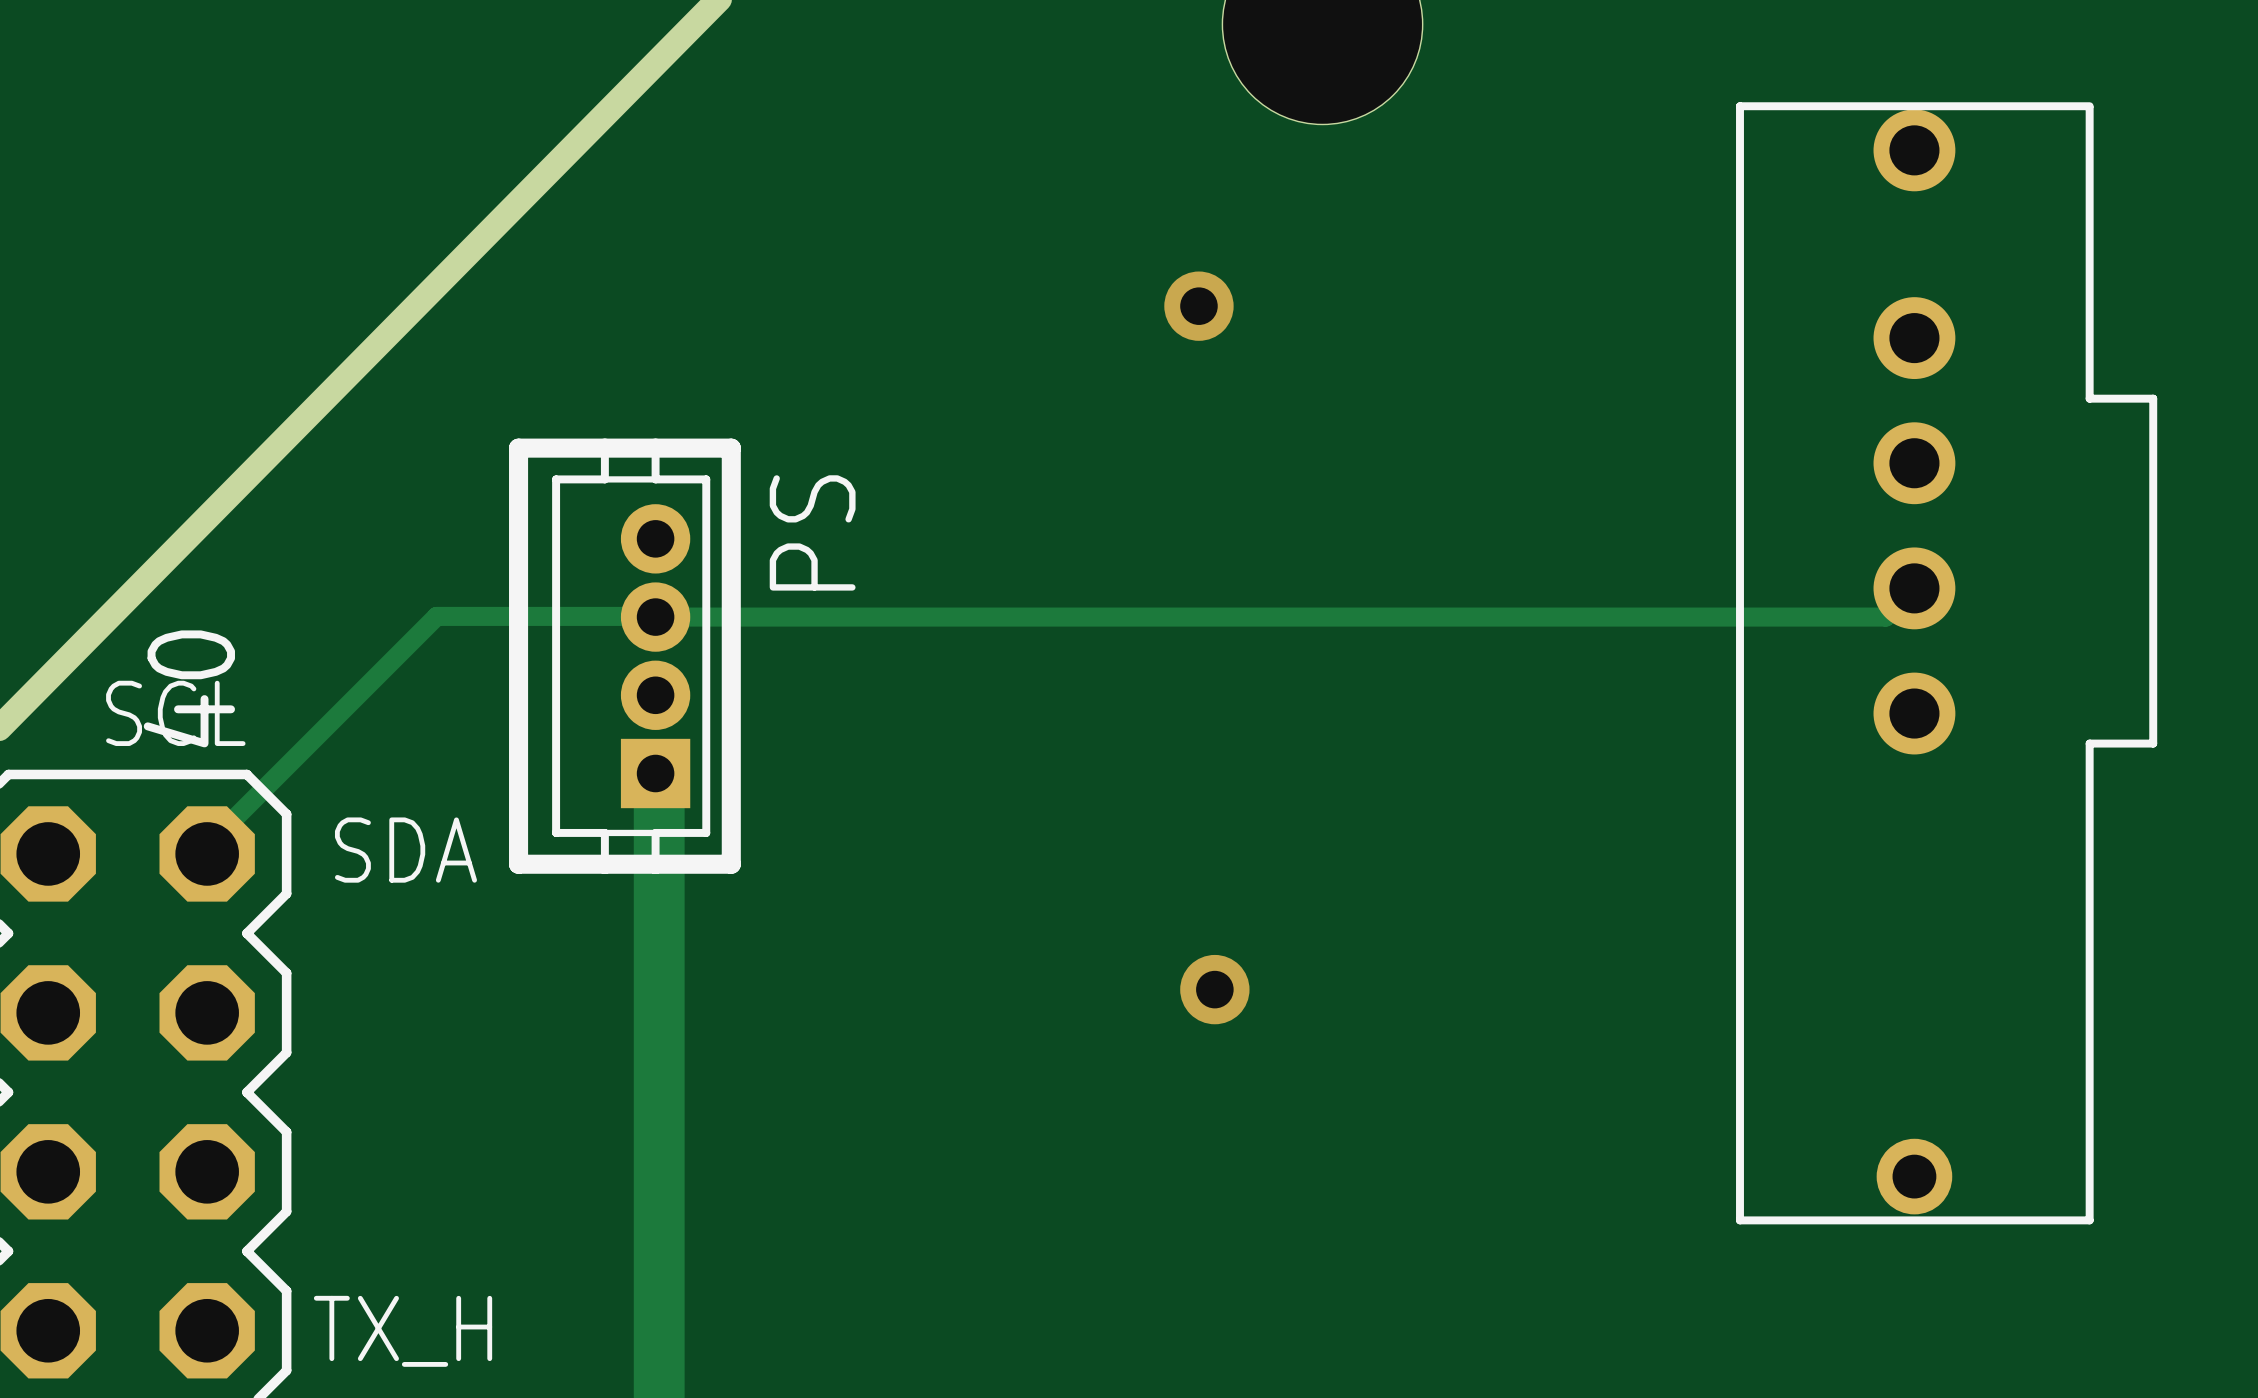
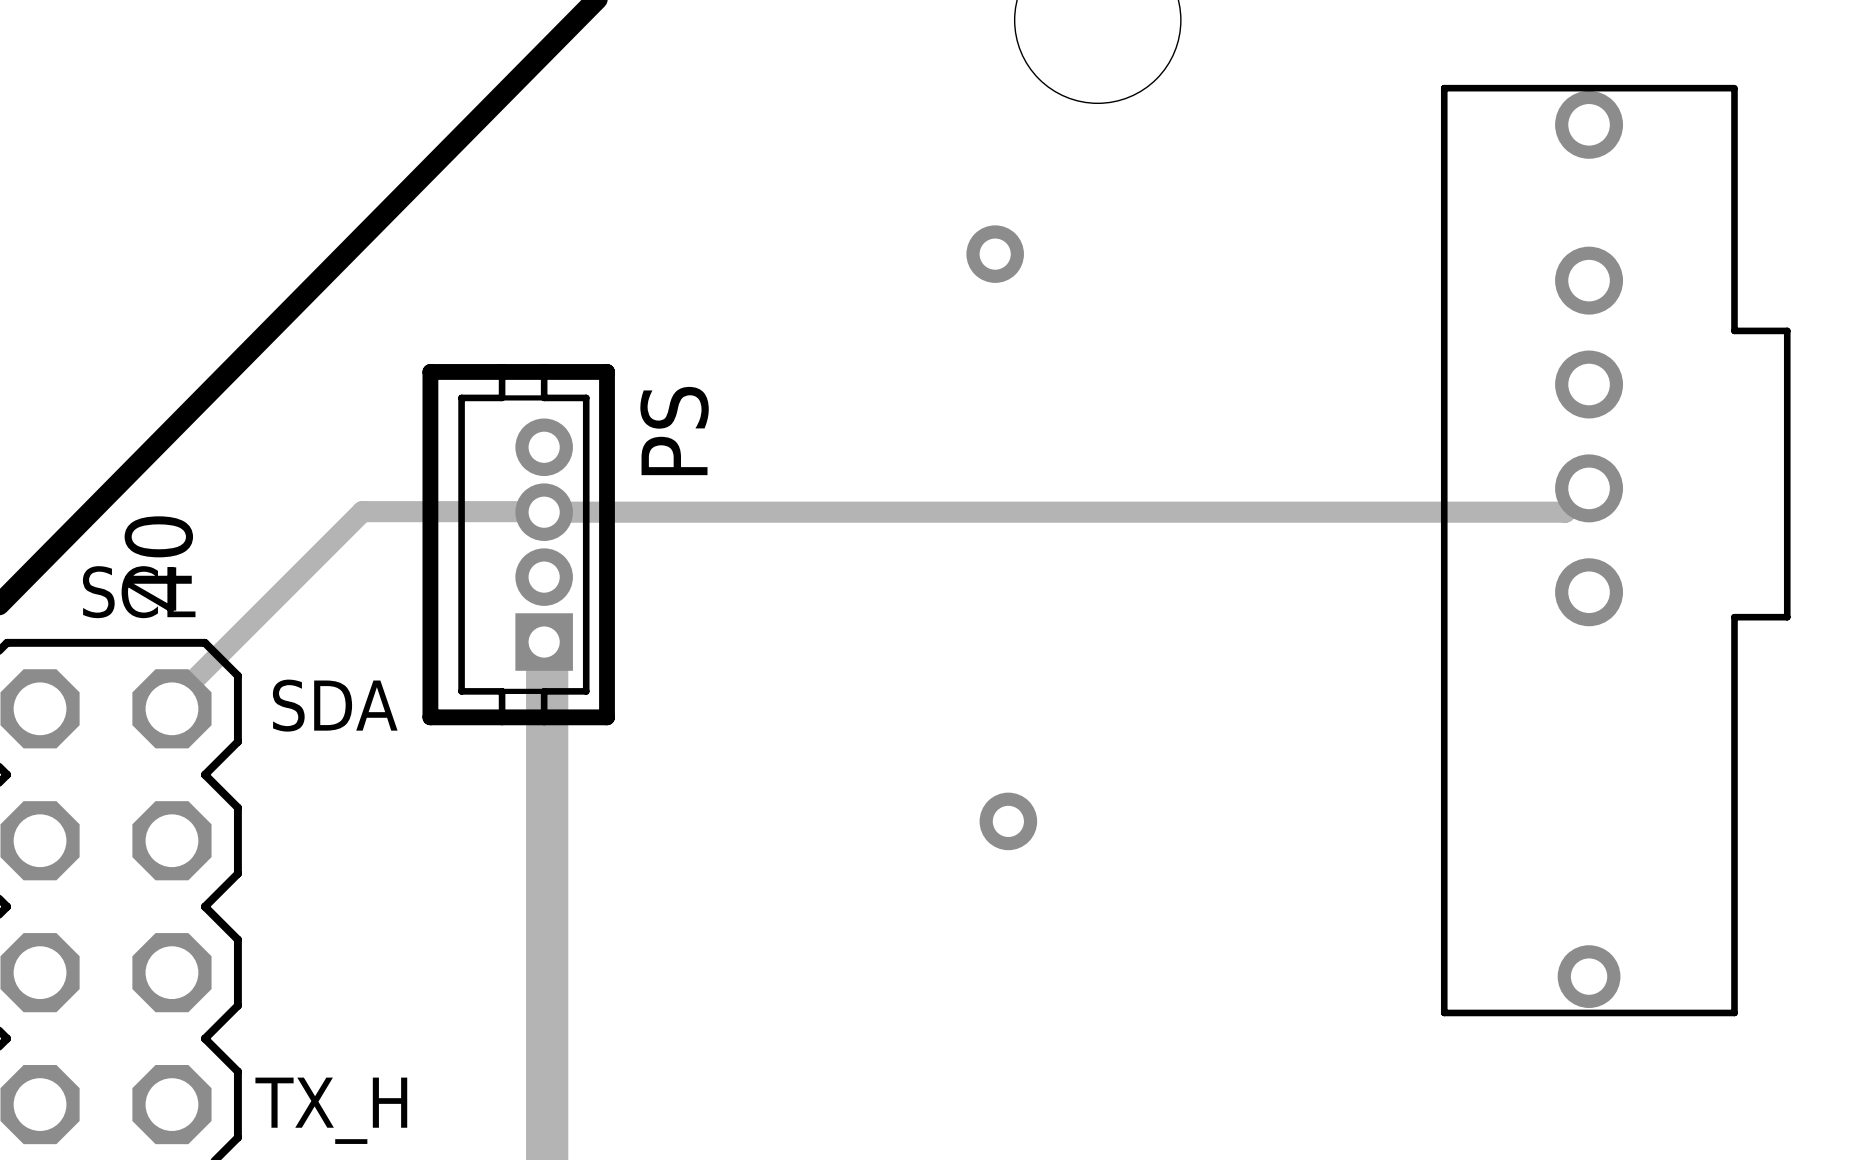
track width: thin (1914, 588) (1885, 617) (655, 617) -> thick (1589, 488) (1565, 512) (544, 512)
track width: thin (654, 616) (436, 616) (207, 845) -> thick (543, 511) (362, 511) (171, 702)

